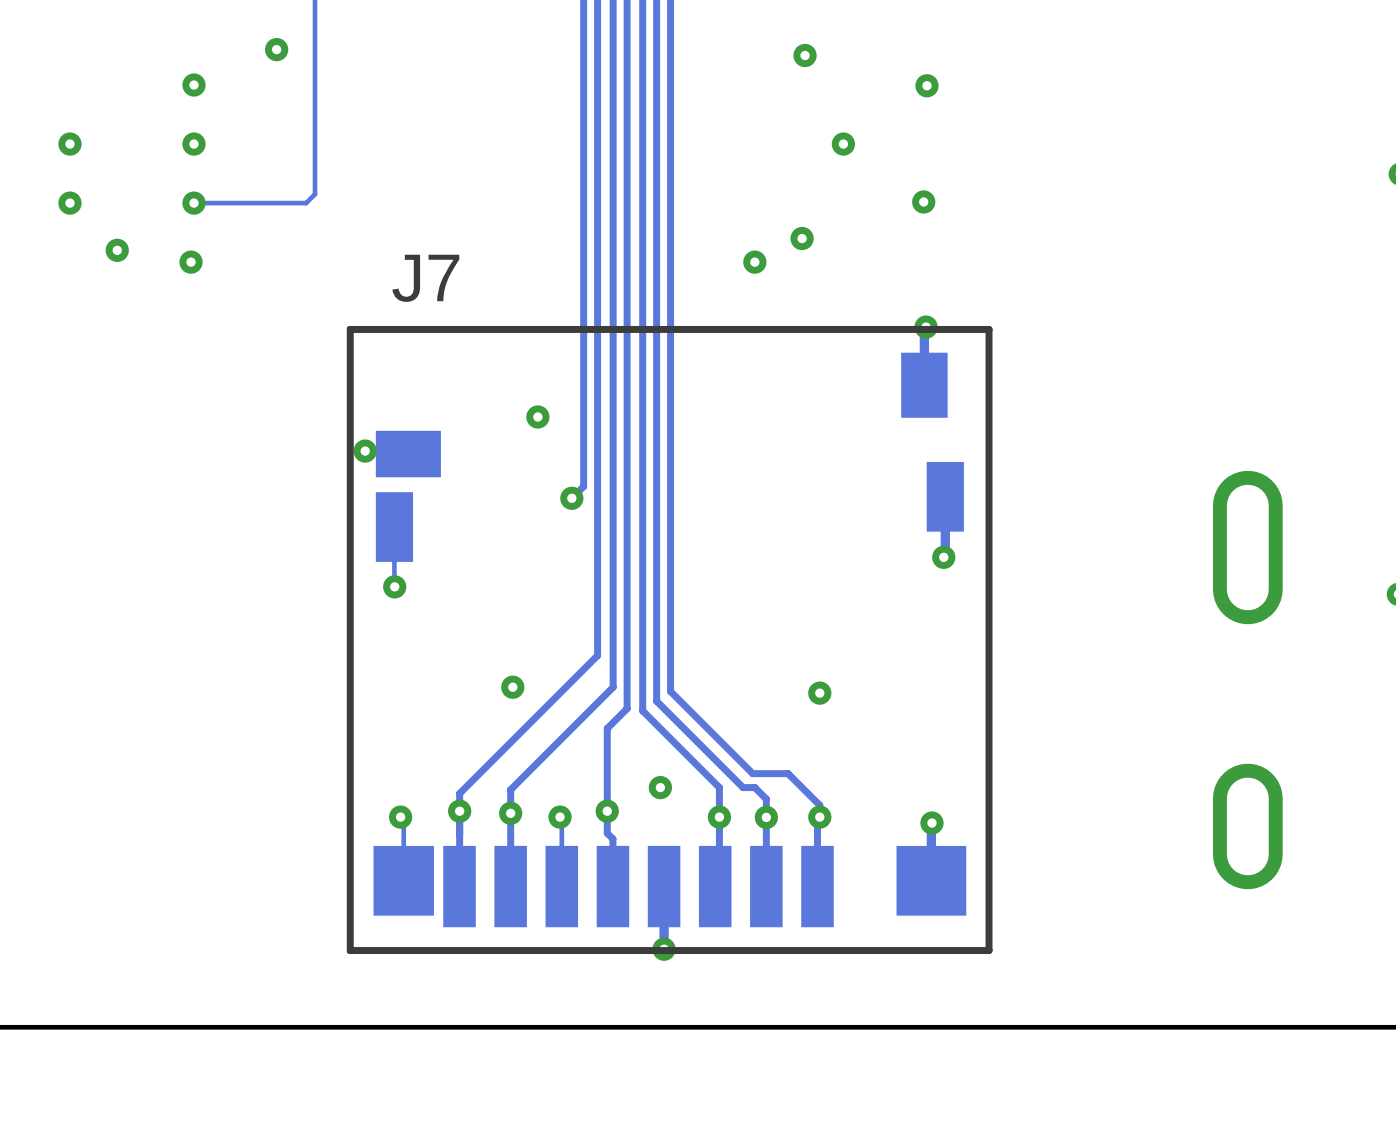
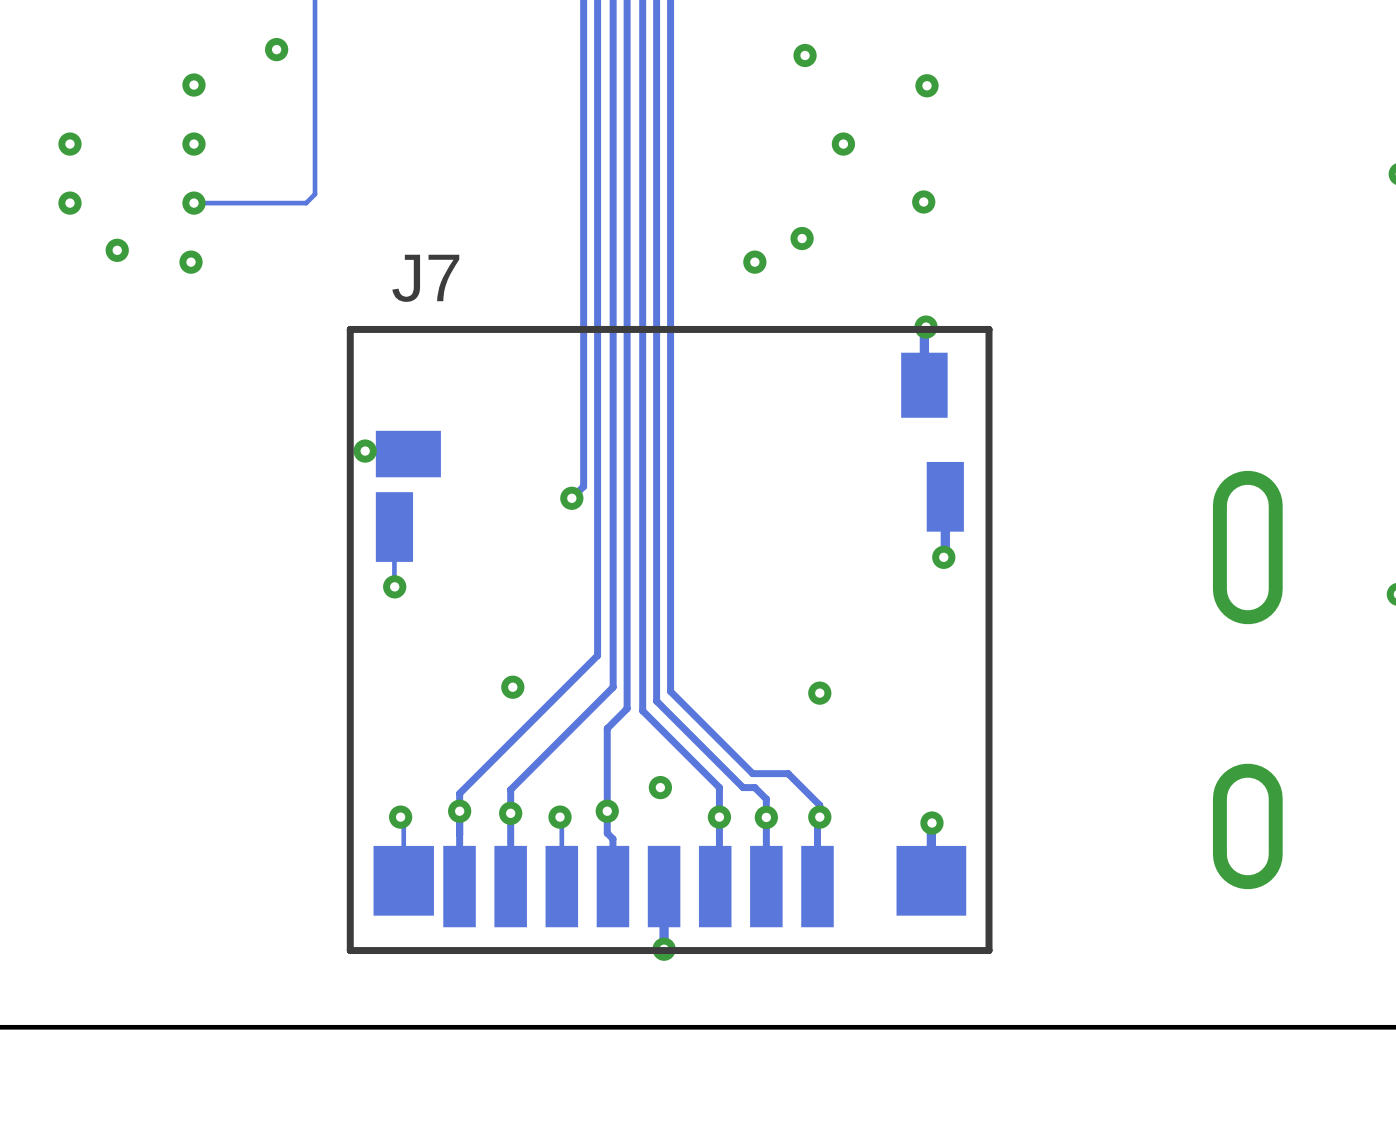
via: (537, 417) -> none

